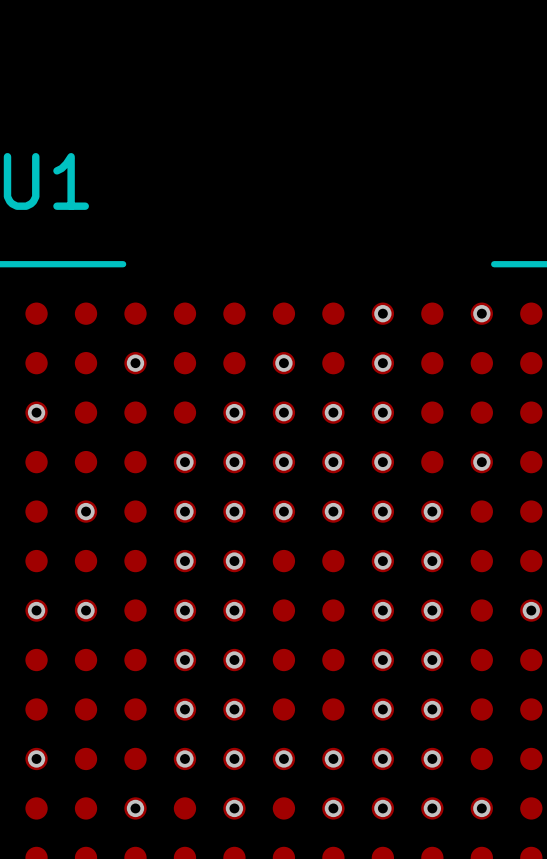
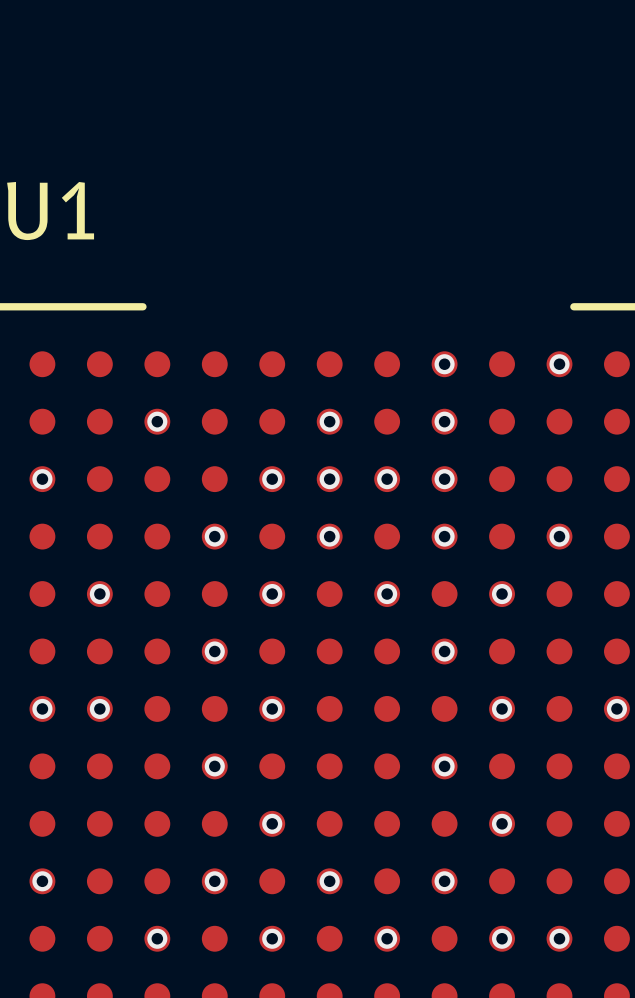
via: (234, 462) -> none
via: (333, 462) -> none
via: (184, 511) -> none
via: (283, 511) -> none
via: (382, 511) -> none
via: (234, 561) -> none
via: (432, 561) -> none
via: (184, 610) -> none
via: (382, 610) -> none
via: (234, 660) -> none
via: (432, 660) -> none
via: (184, 709) -> none
via: (382, 709) -> none
via: (234, 758) -> none
via: (333, 758) -> none
via: (432, 758) -> none
via: (382, 808) -> none

